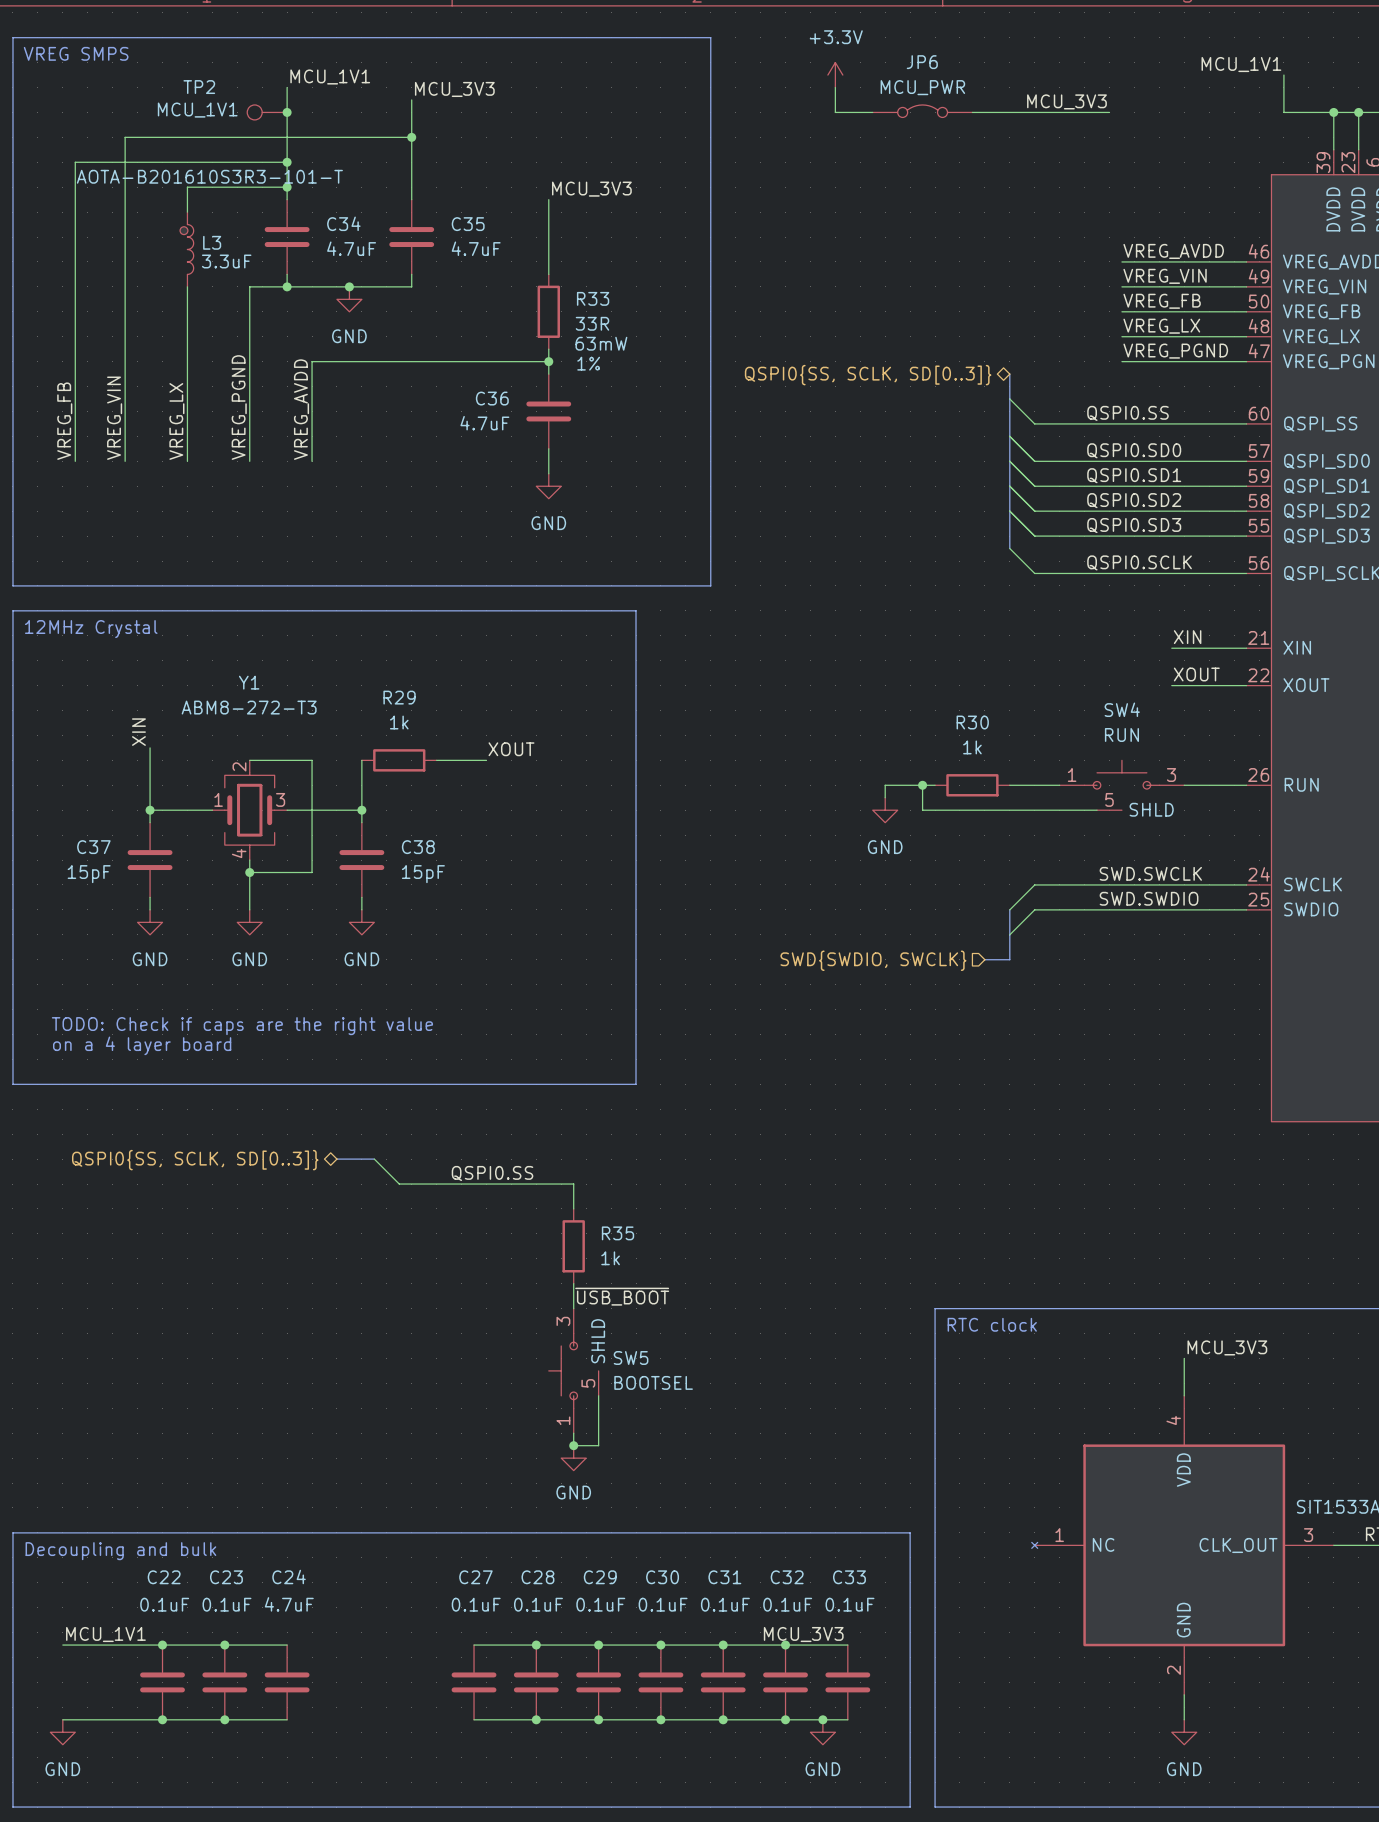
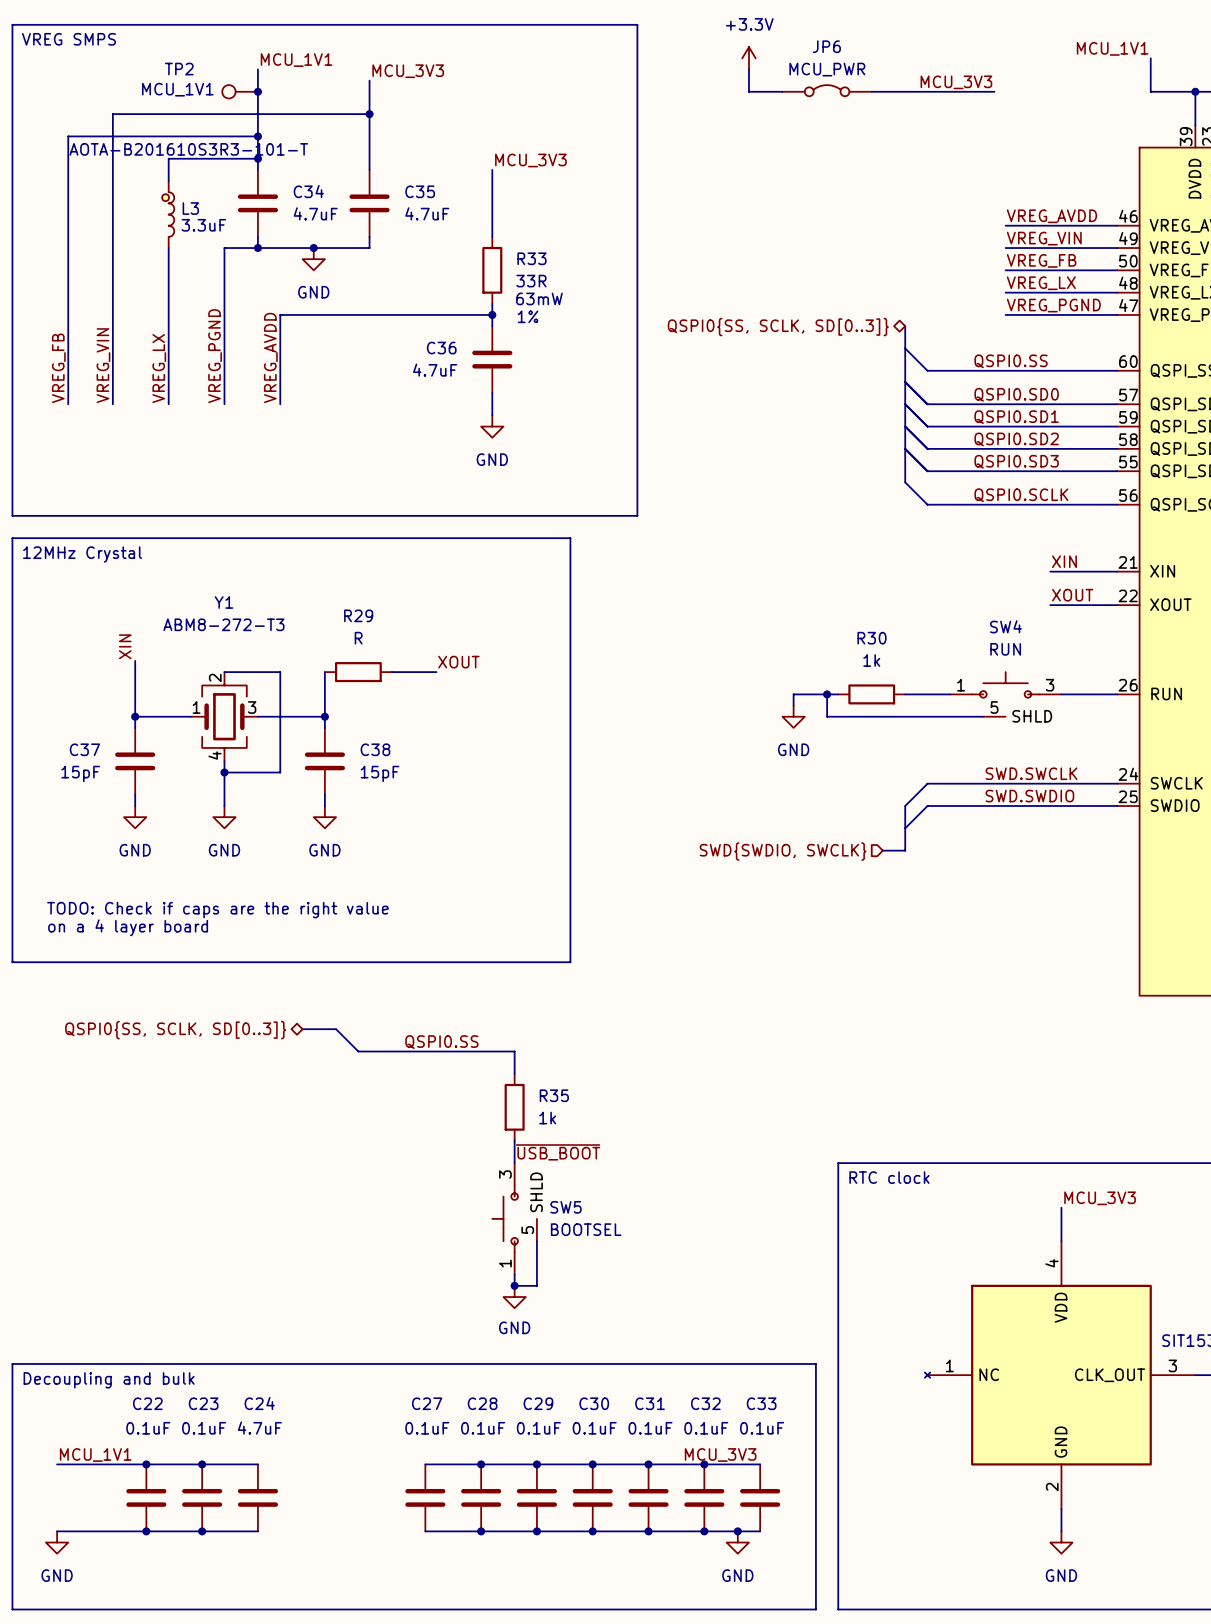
R29 value: 1k (399, 722) -> R (358, 638)

